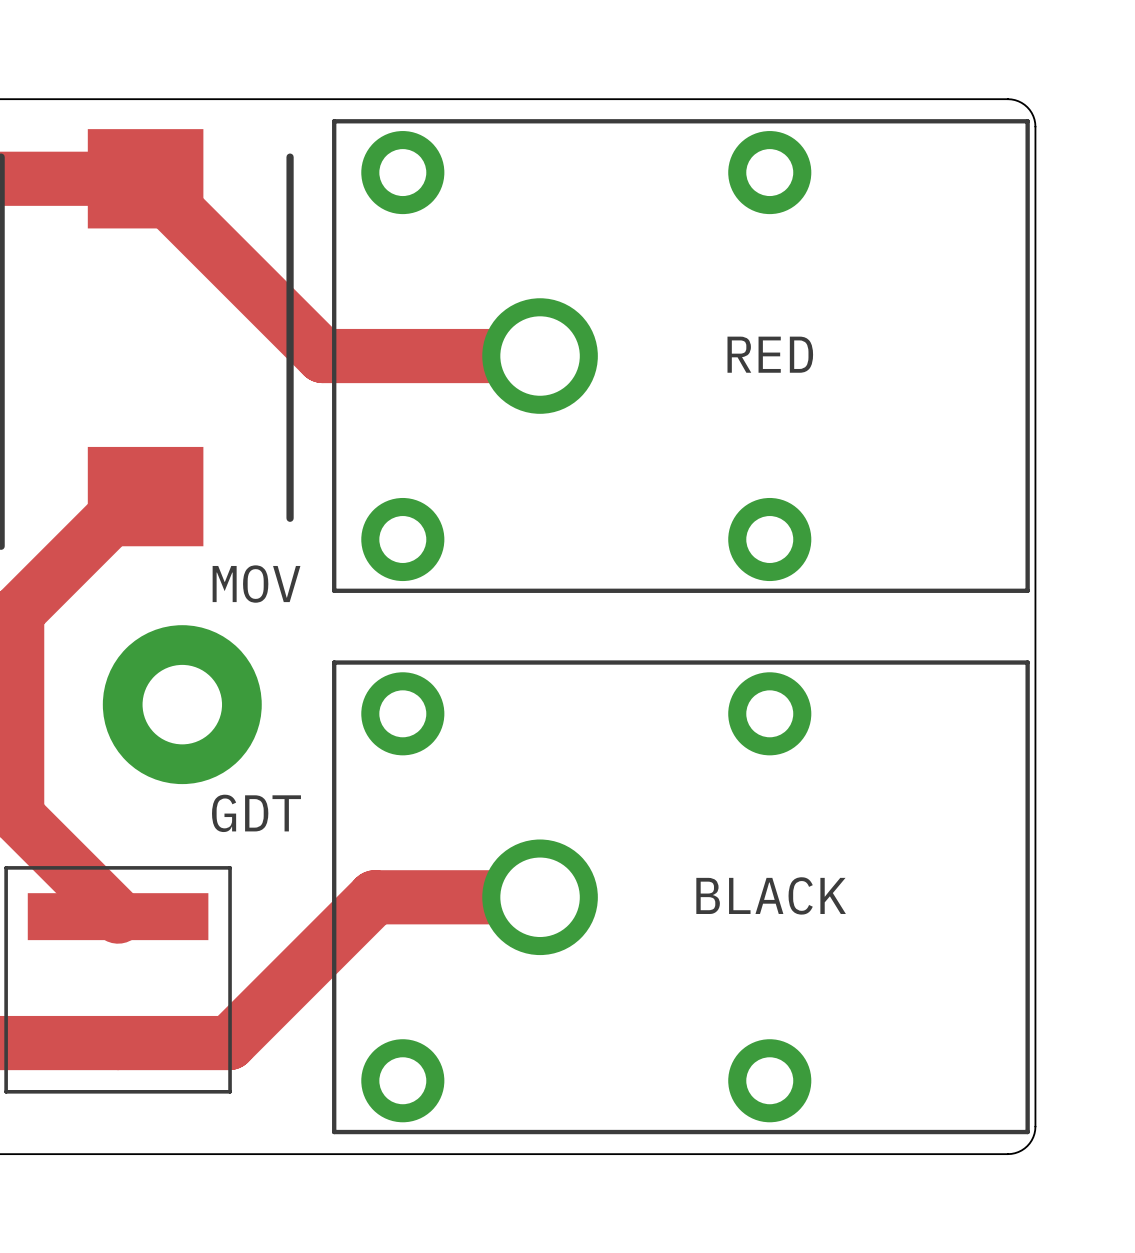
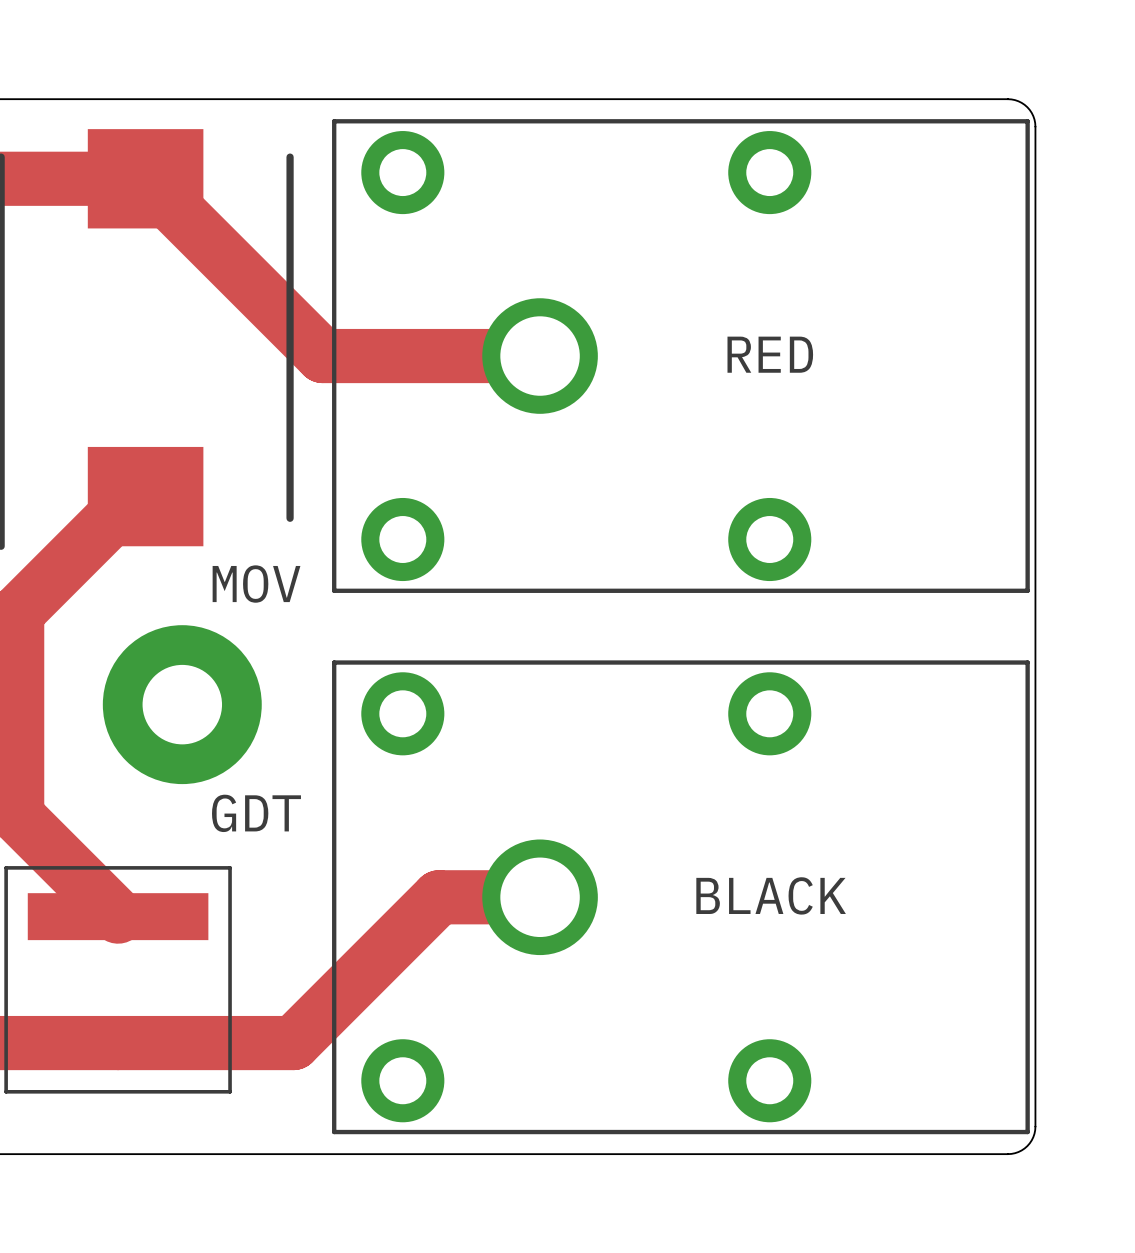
track: (439, 897) (374, 897) (229, 1043) -> (439, 897) (293, 1043) (229, 1043)

